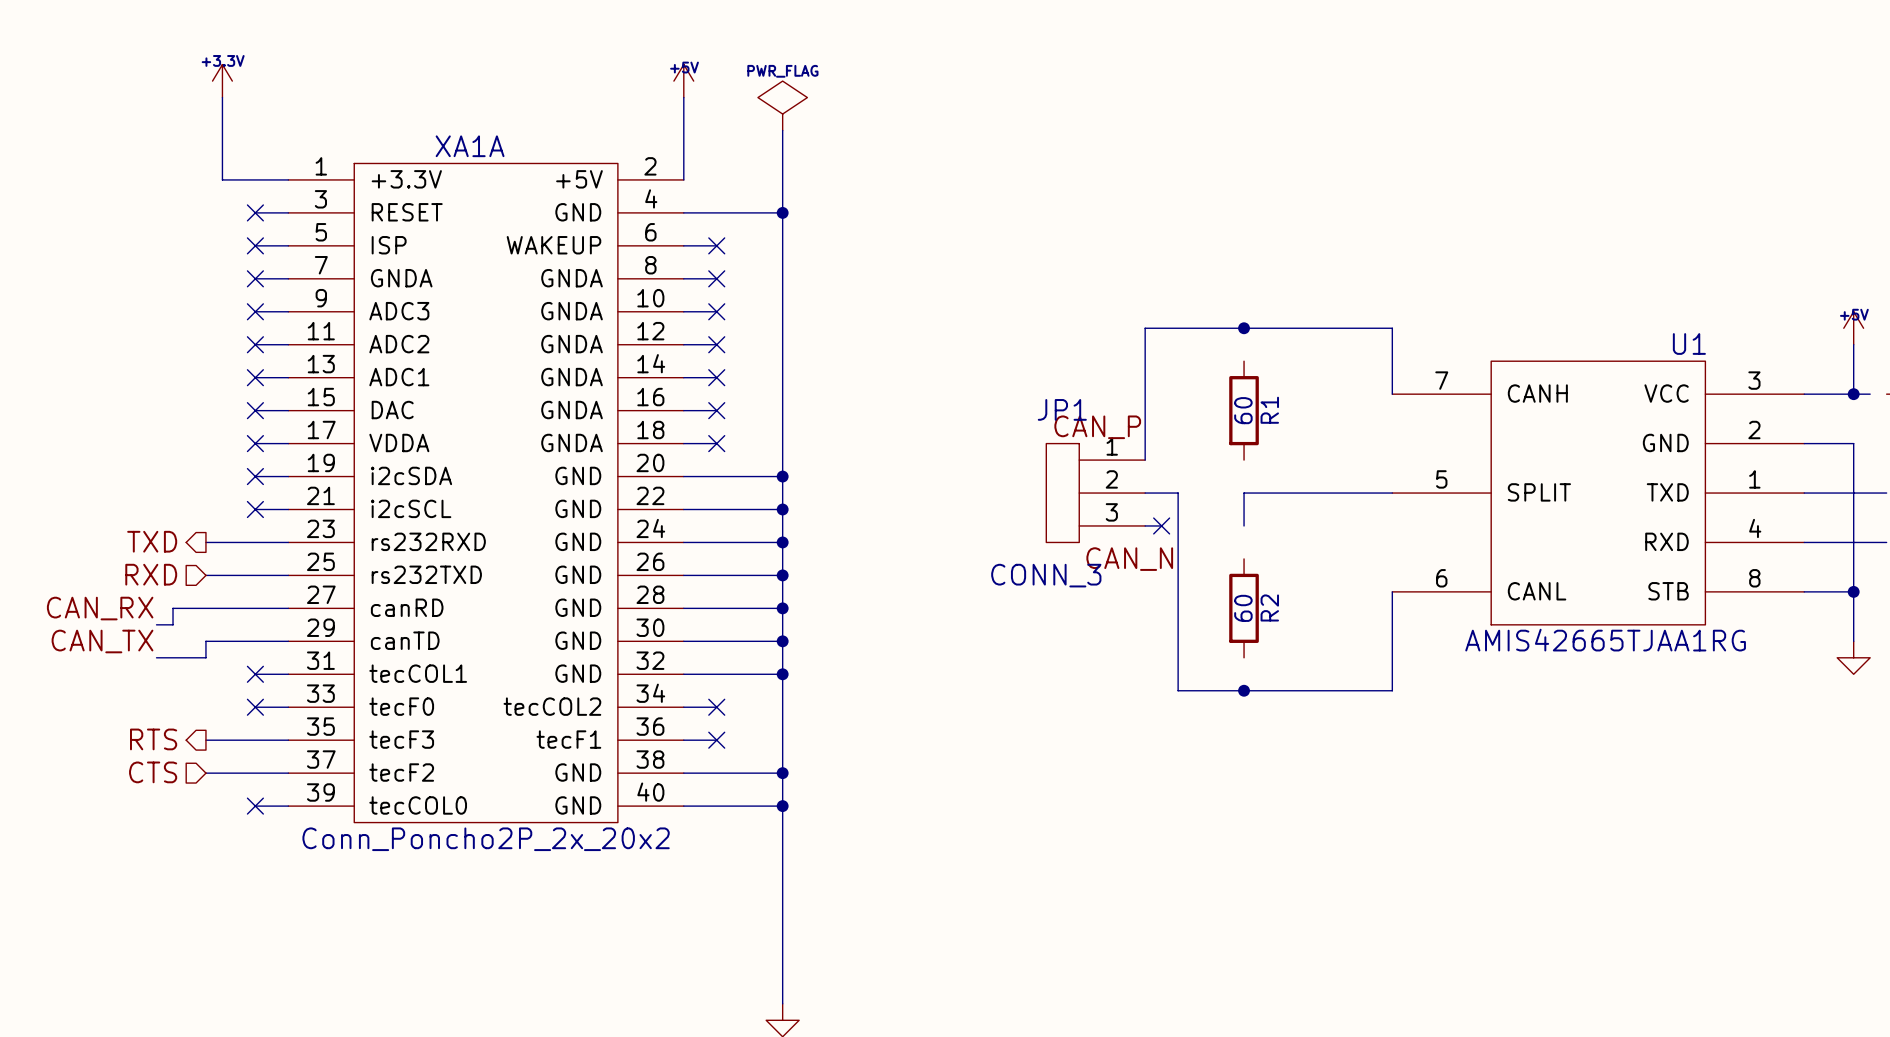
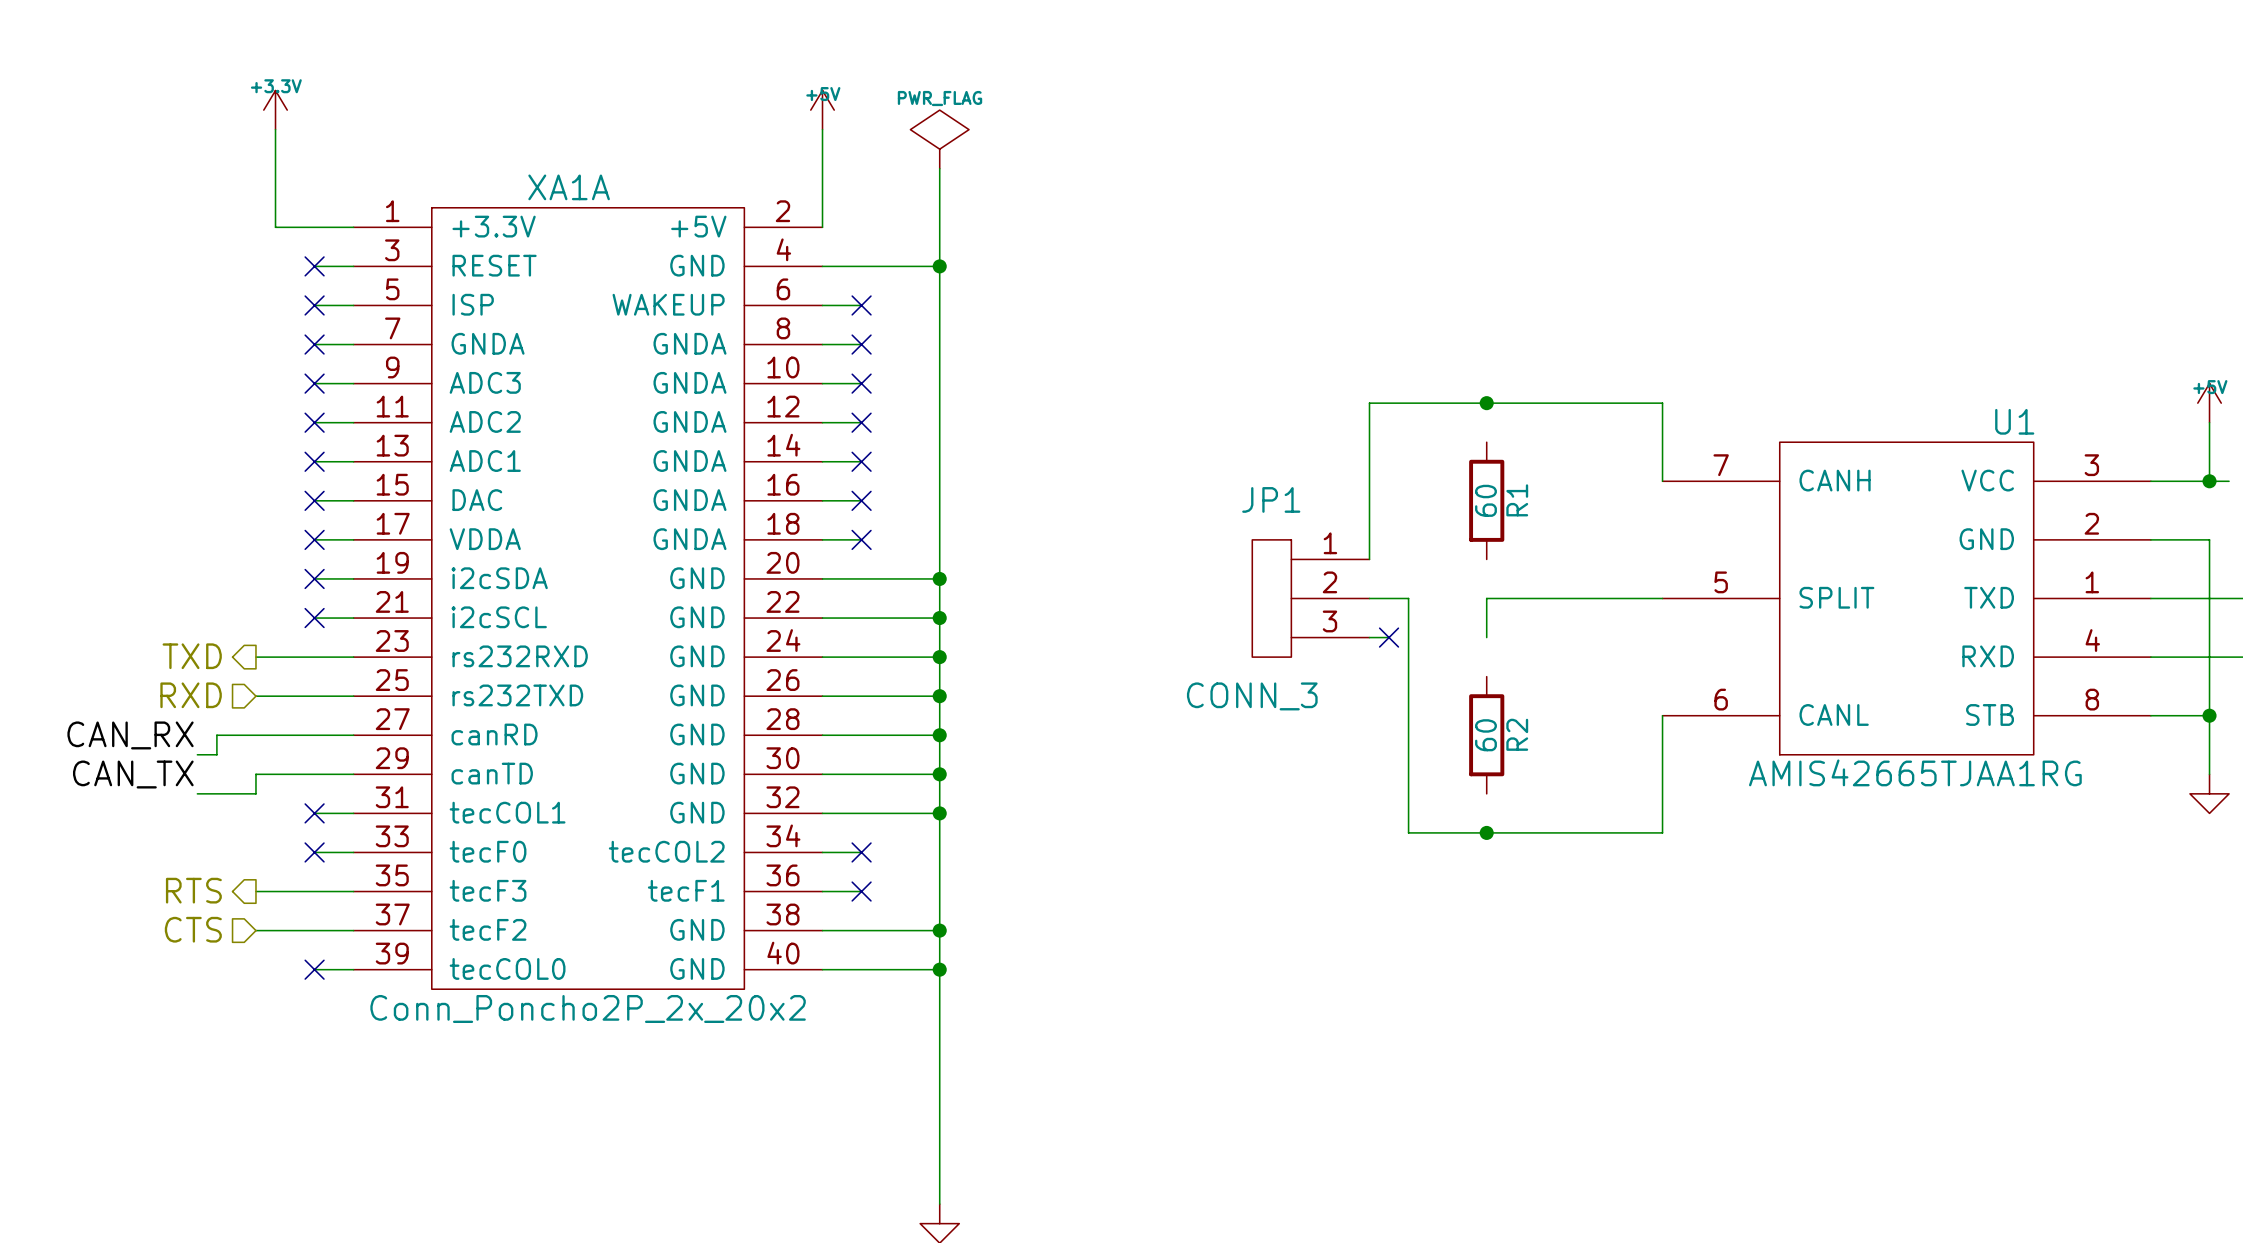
label: CAN_P (1097, 427) -> none
label: CAN_N (1129, 559) -> none

